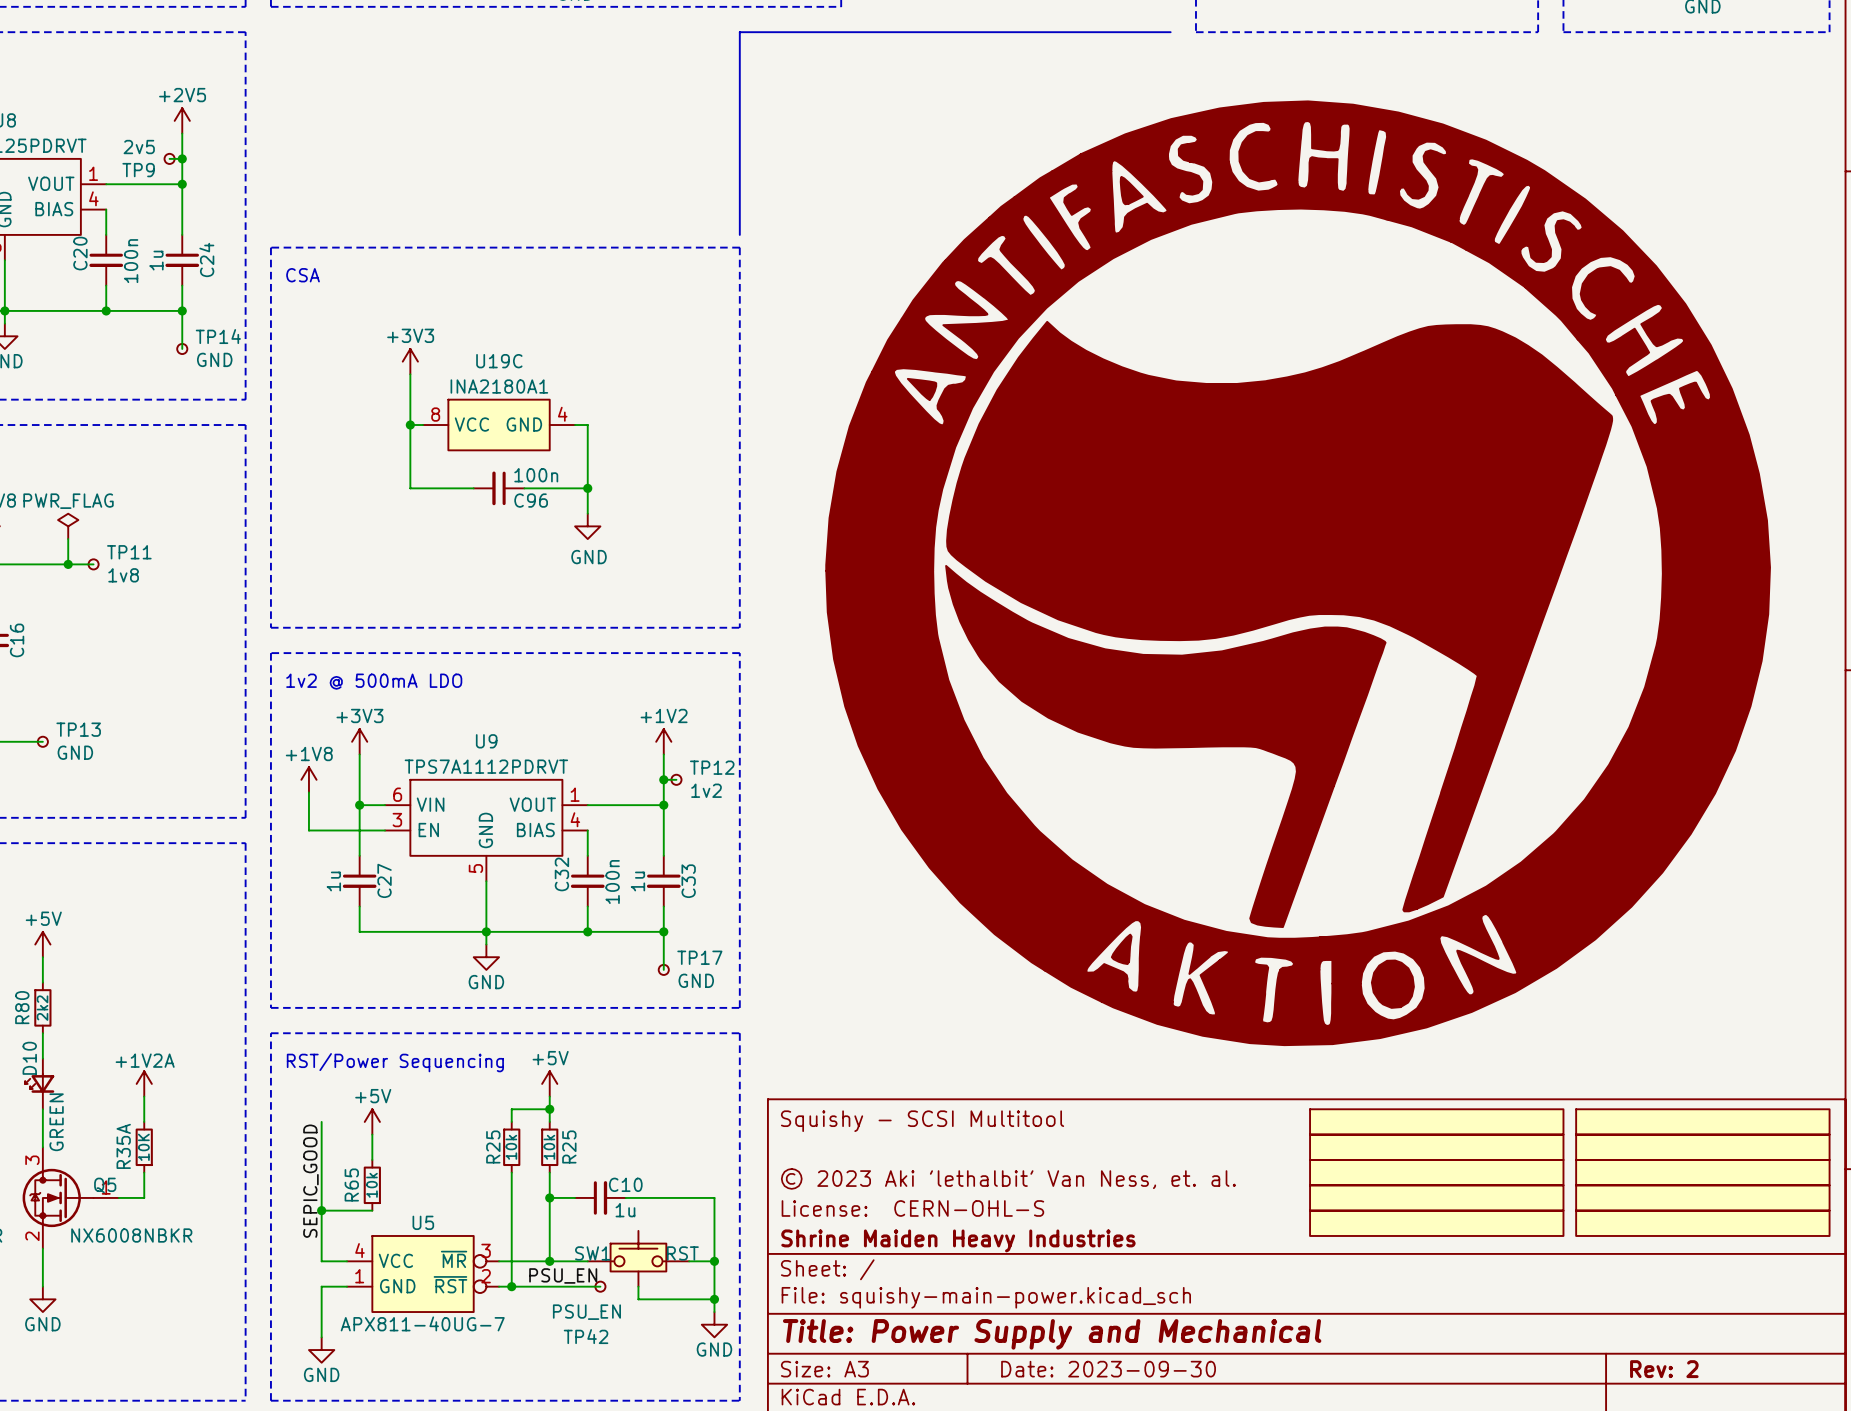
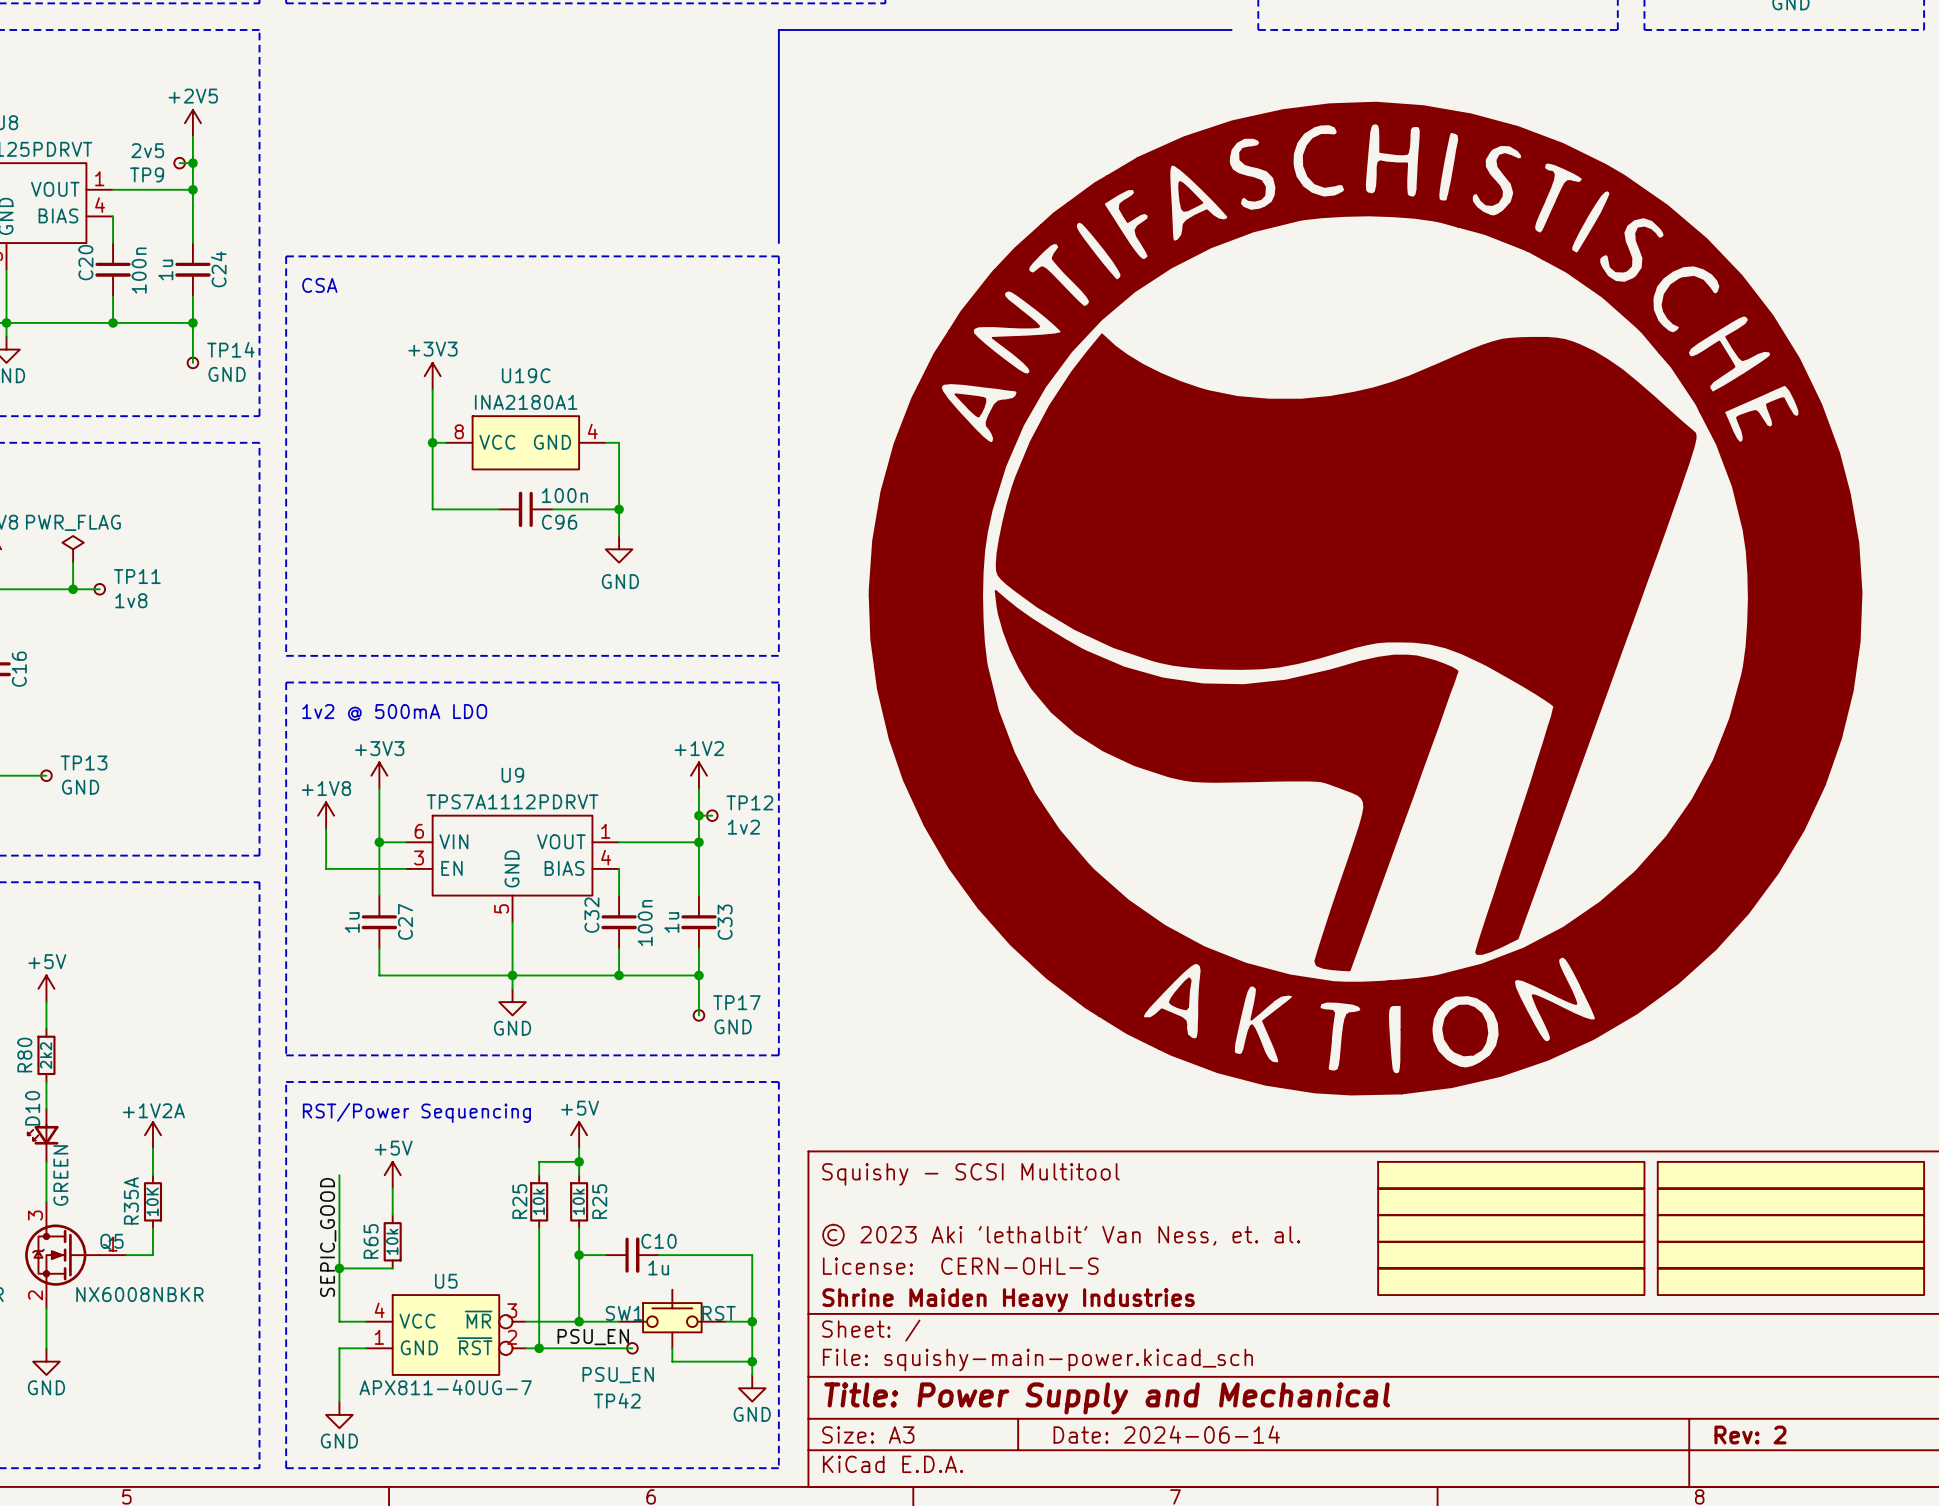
title block: Date: 2023-09-30 (1108, 1369) -> Date: 2024-06-14 (1166, 1434)

